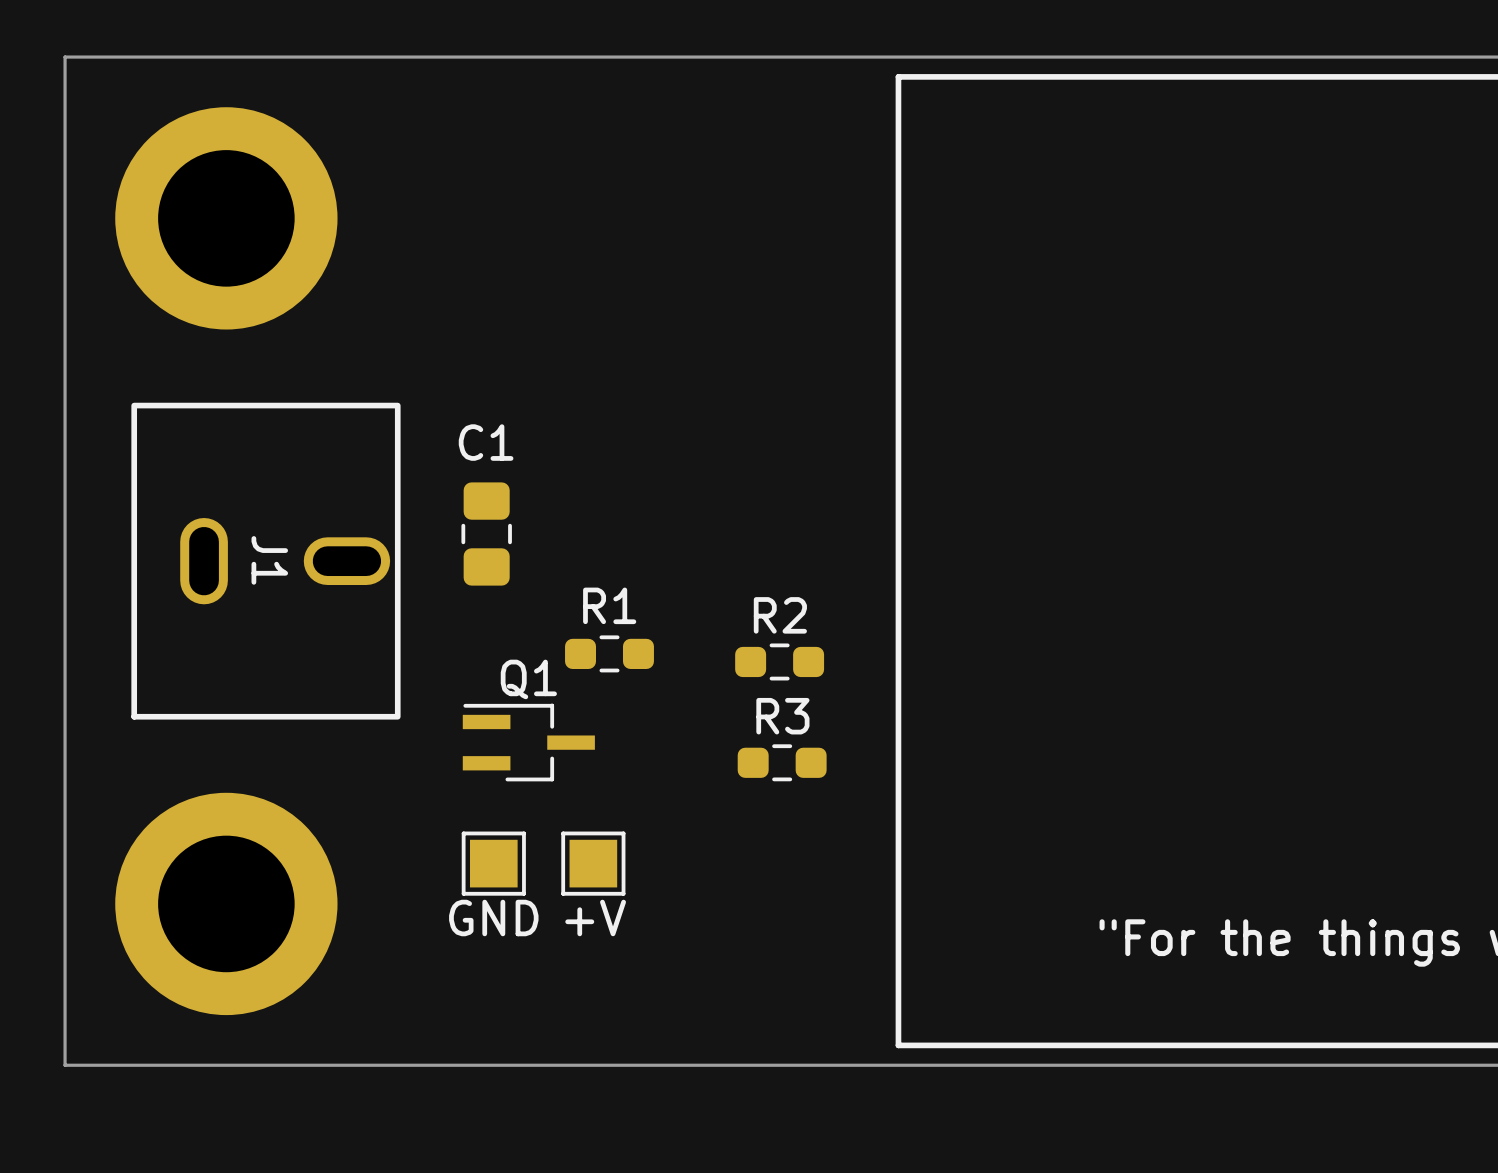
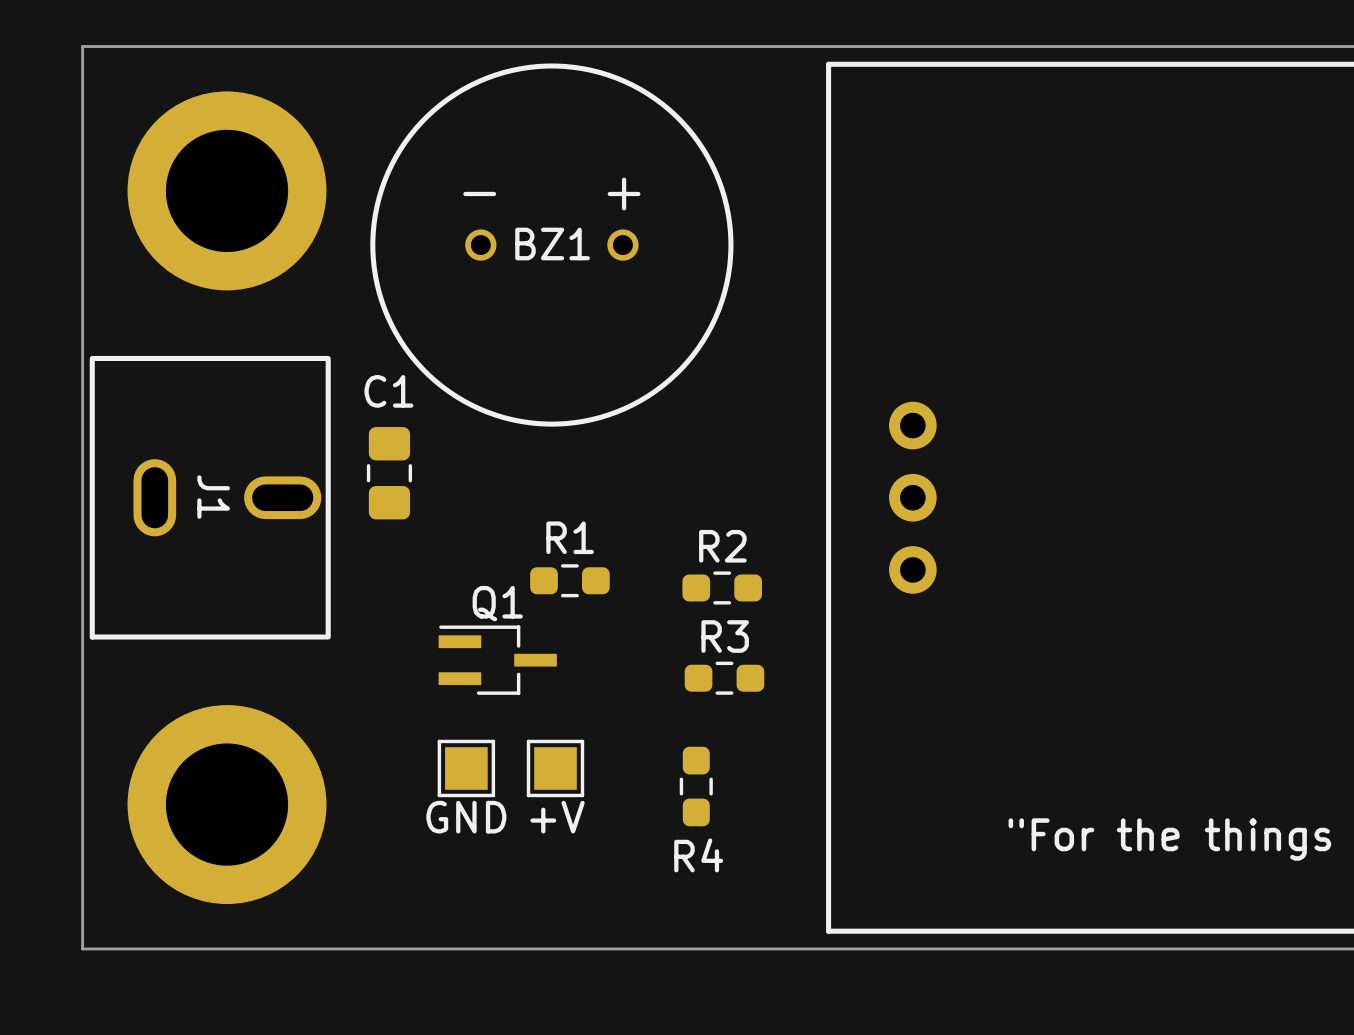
BZ1: none -> (551, 245)
C1 position: (486, 534) -> (389, 473)
J1 position: (265, 561) -> (210, 497)
part: none -> (912, 497)
R4: none -> (696, 786)

